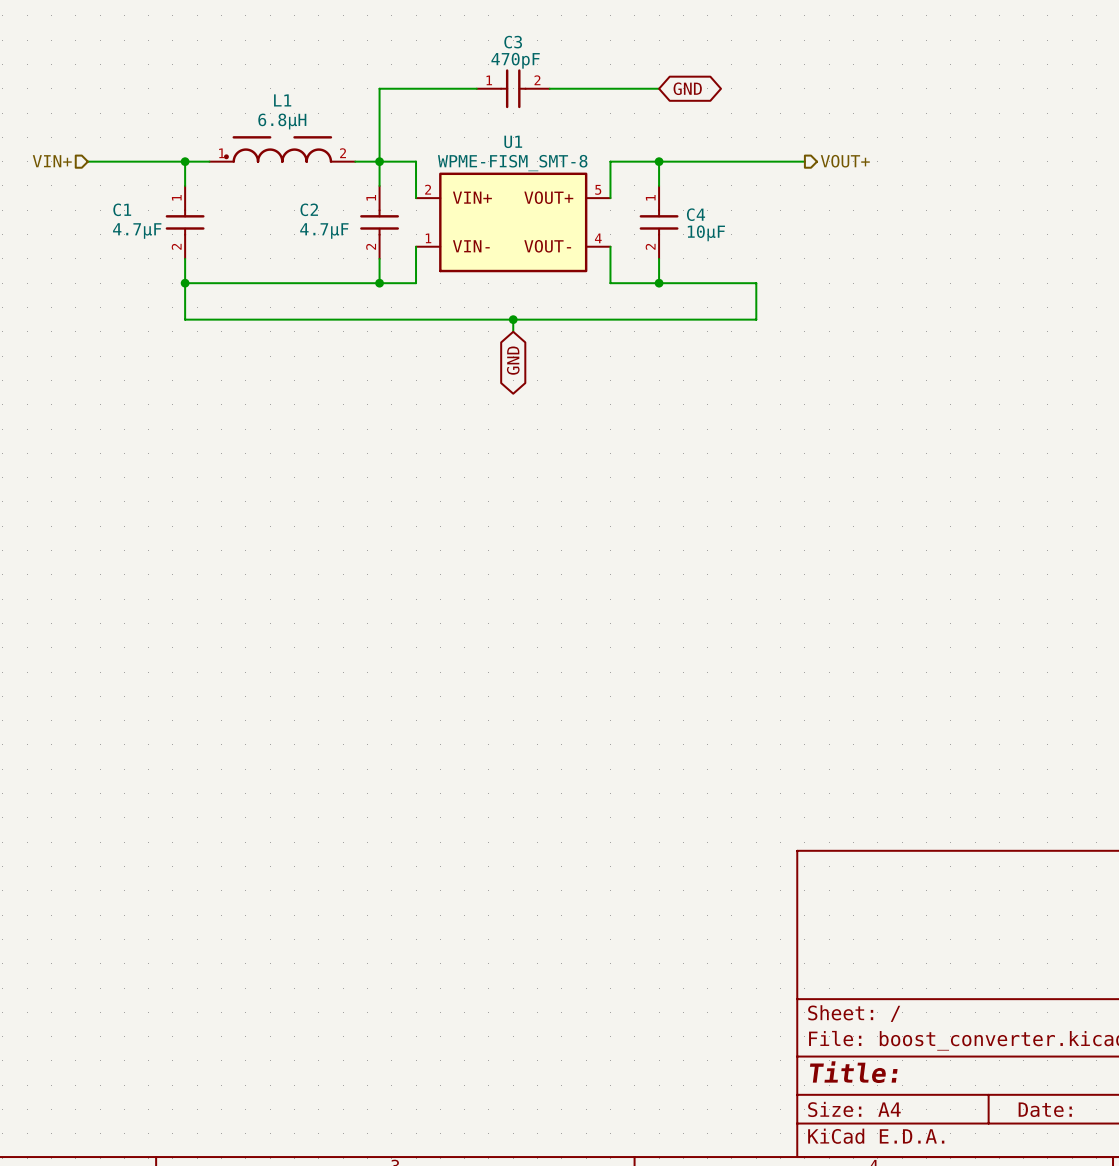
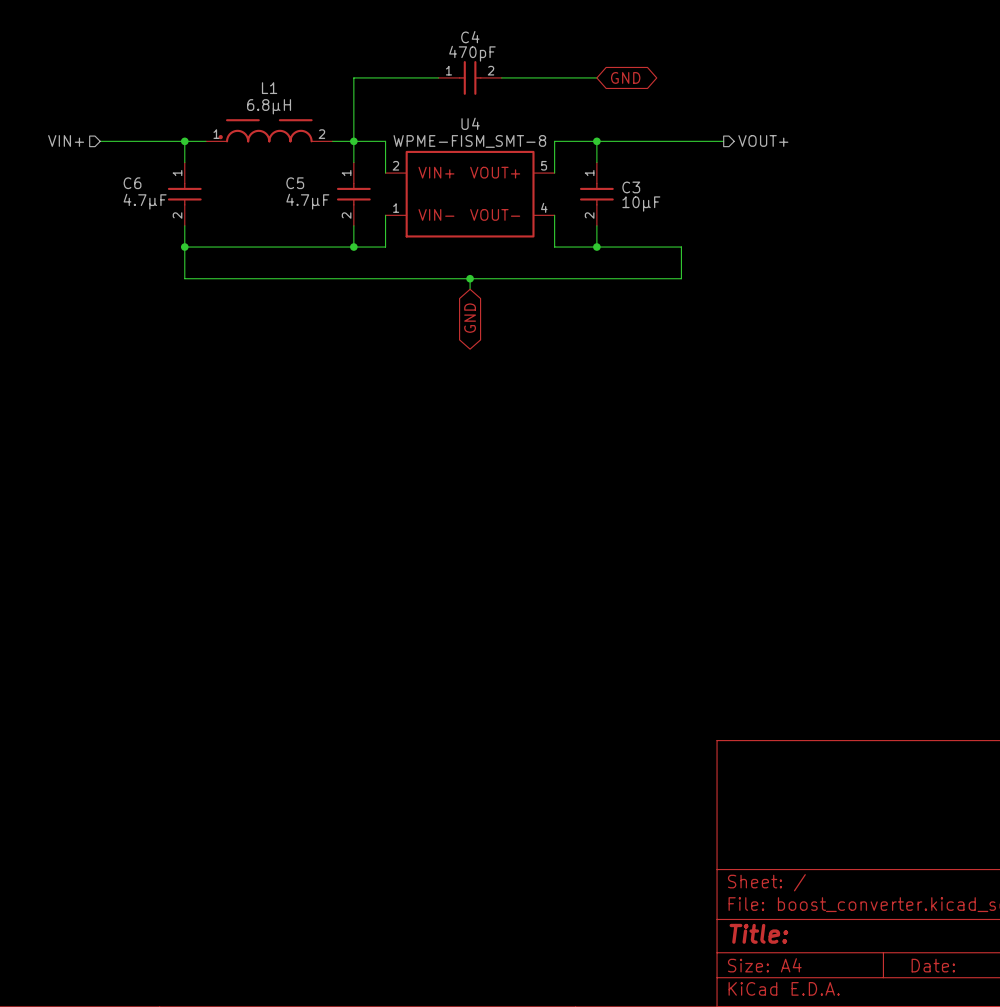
C3 name: C3 (513, 42) -> C4 (470, 37)
U1 name: U1 (513, 141) -> U4 (470, 123)
C1 name: C1 (122, 209) -> C6 (132, 183)
C2 name: C2 (309, 209) -> C5 (295, 183)
C4 name: C4 (696, 214) -> C3 (631, 187)

